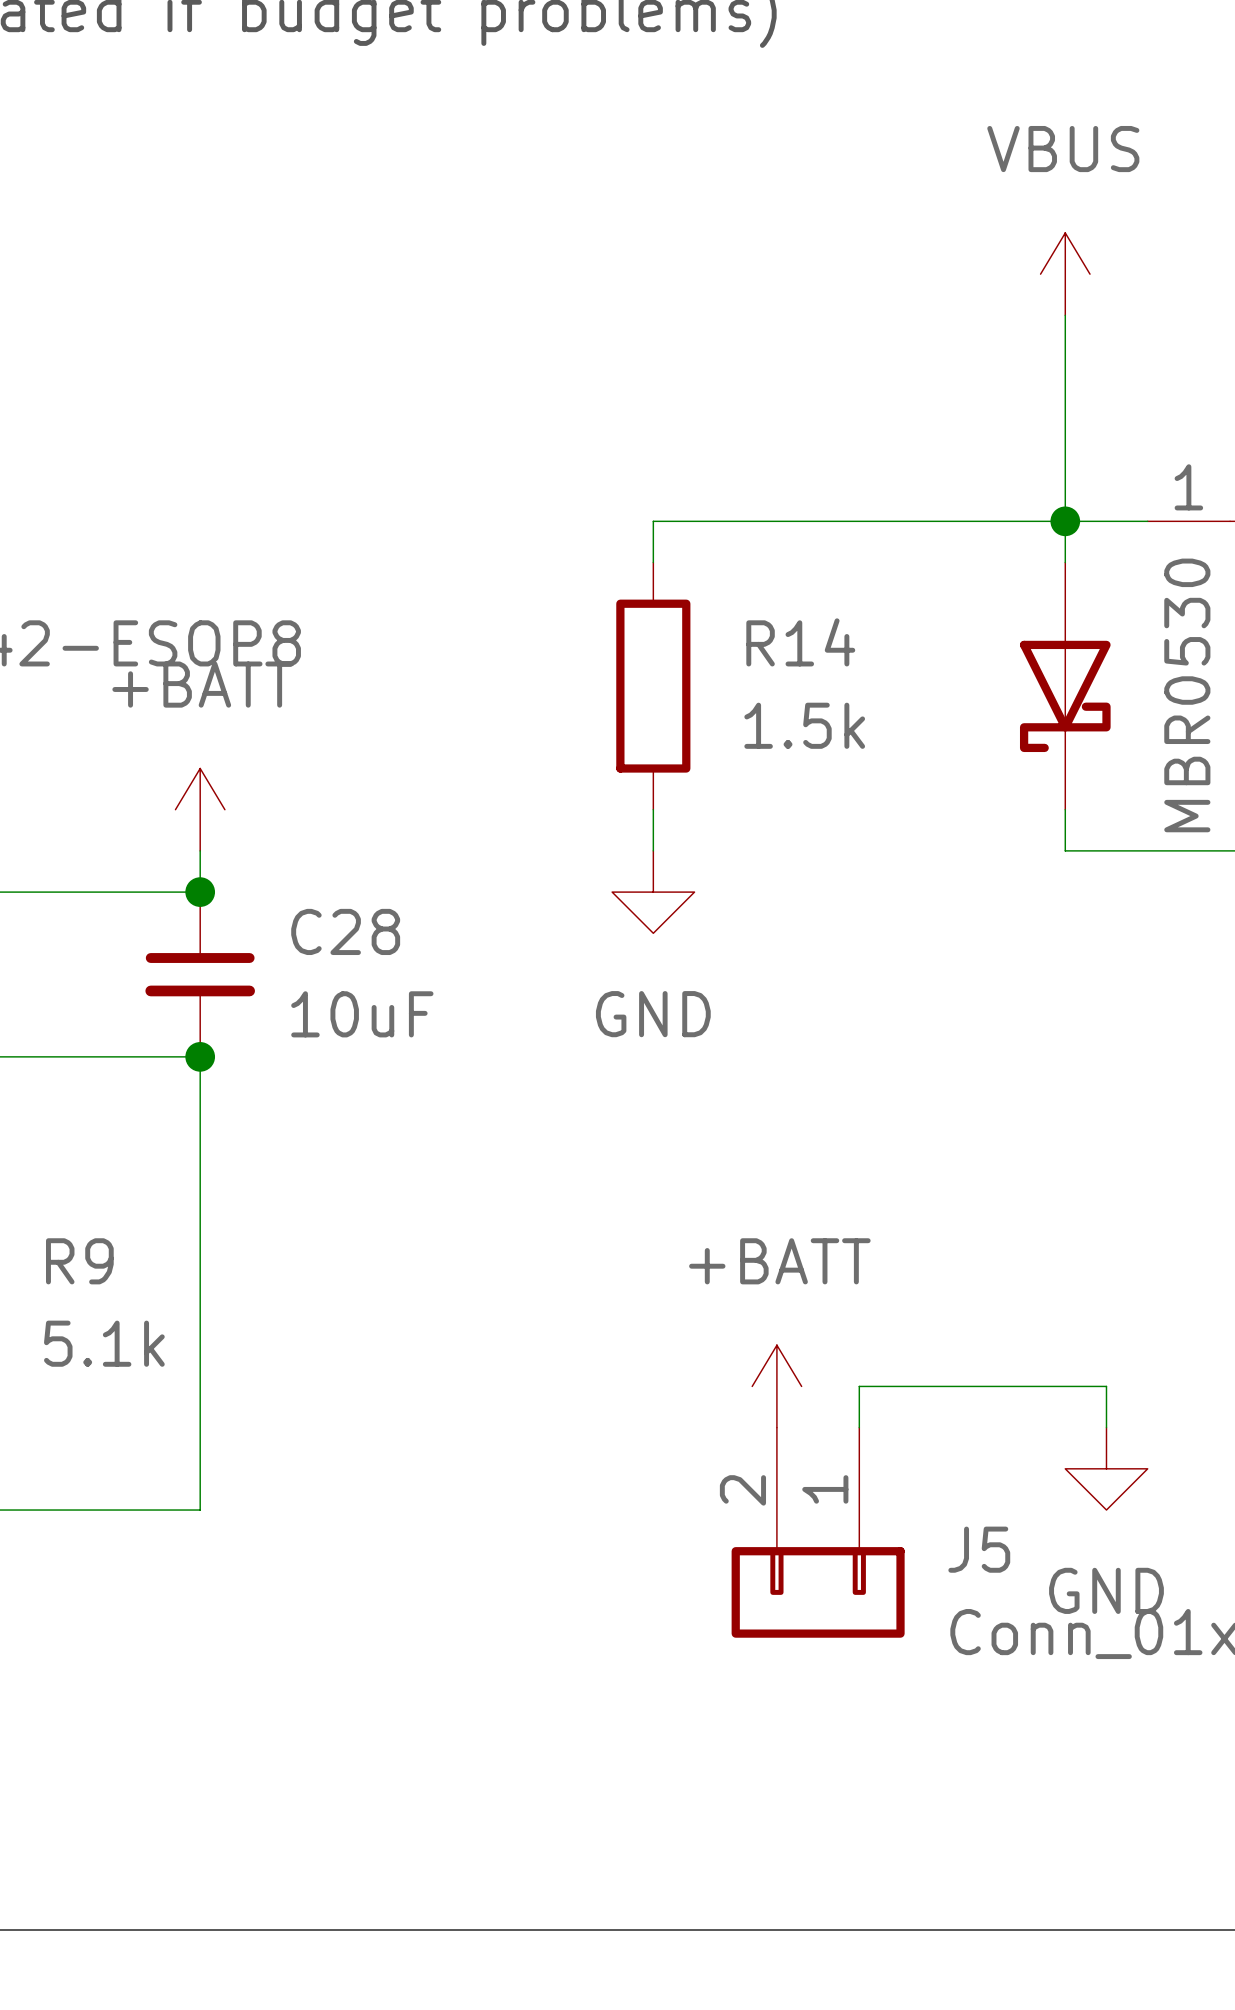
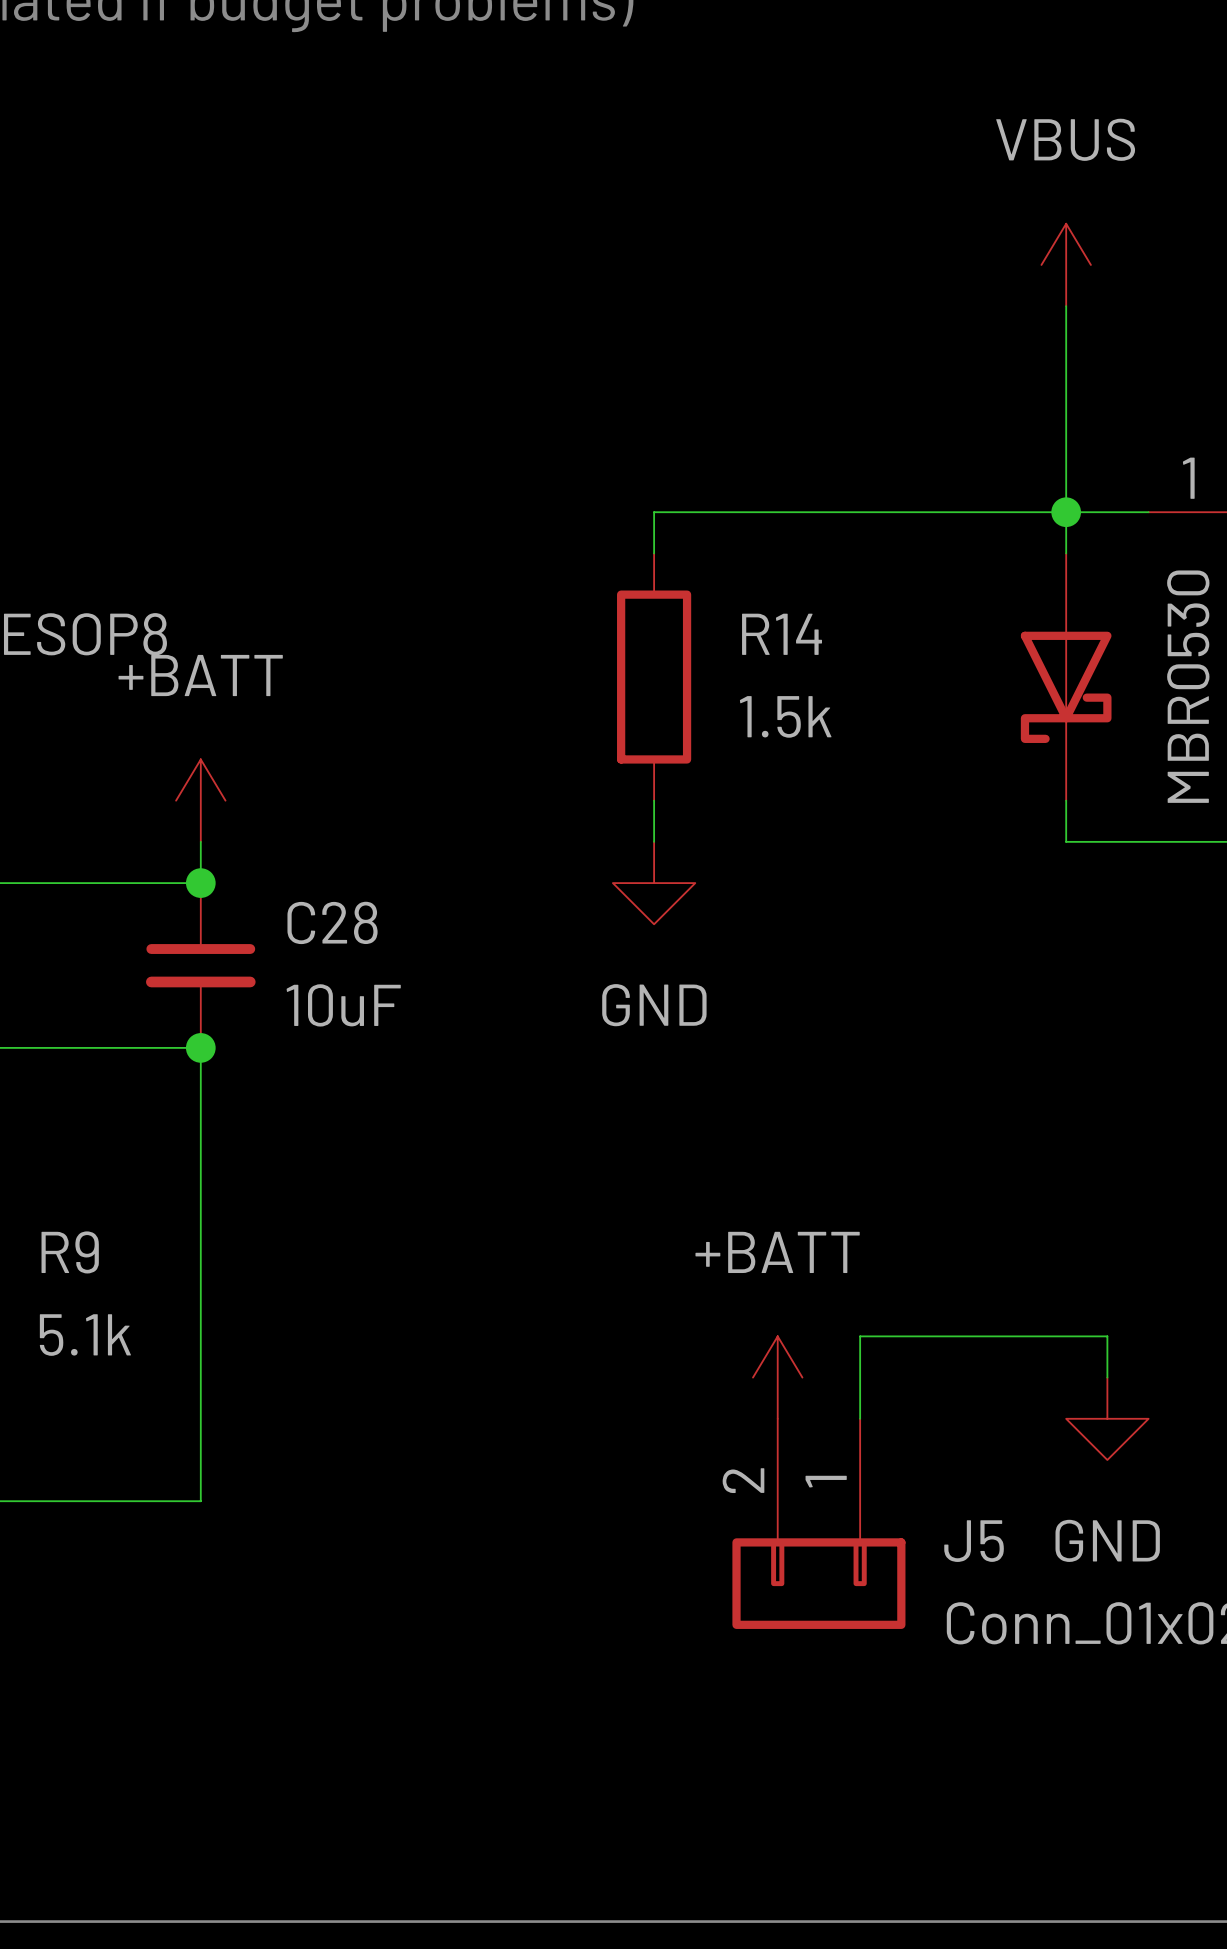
wire: (859, 1386) (1106, 1386) (1106, 1427) -> (860, 1377) (860, 1336) (1107, 1336) (1107, 1377)
power symbol position: GND (1106, 1468) -> GND (1107, 1418)

